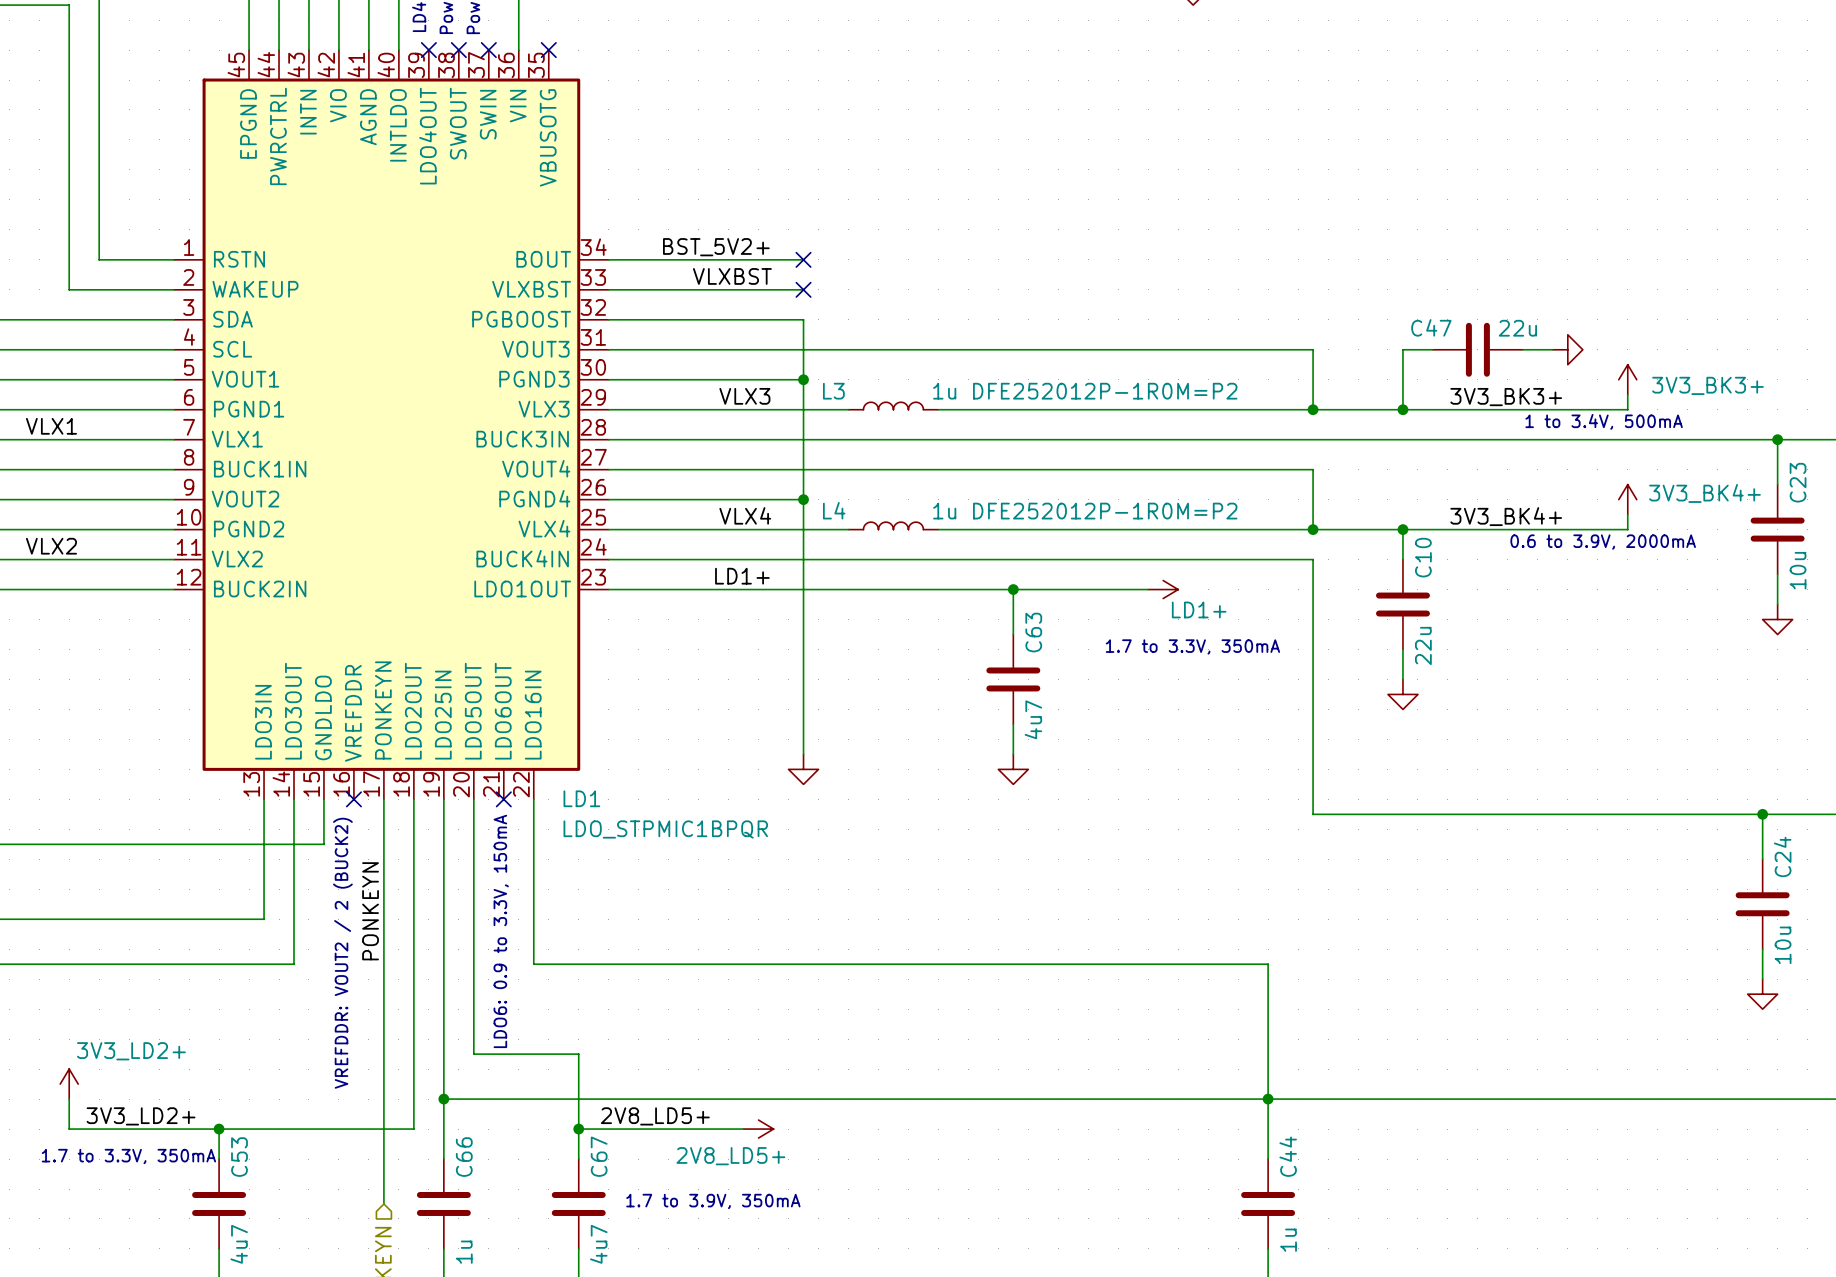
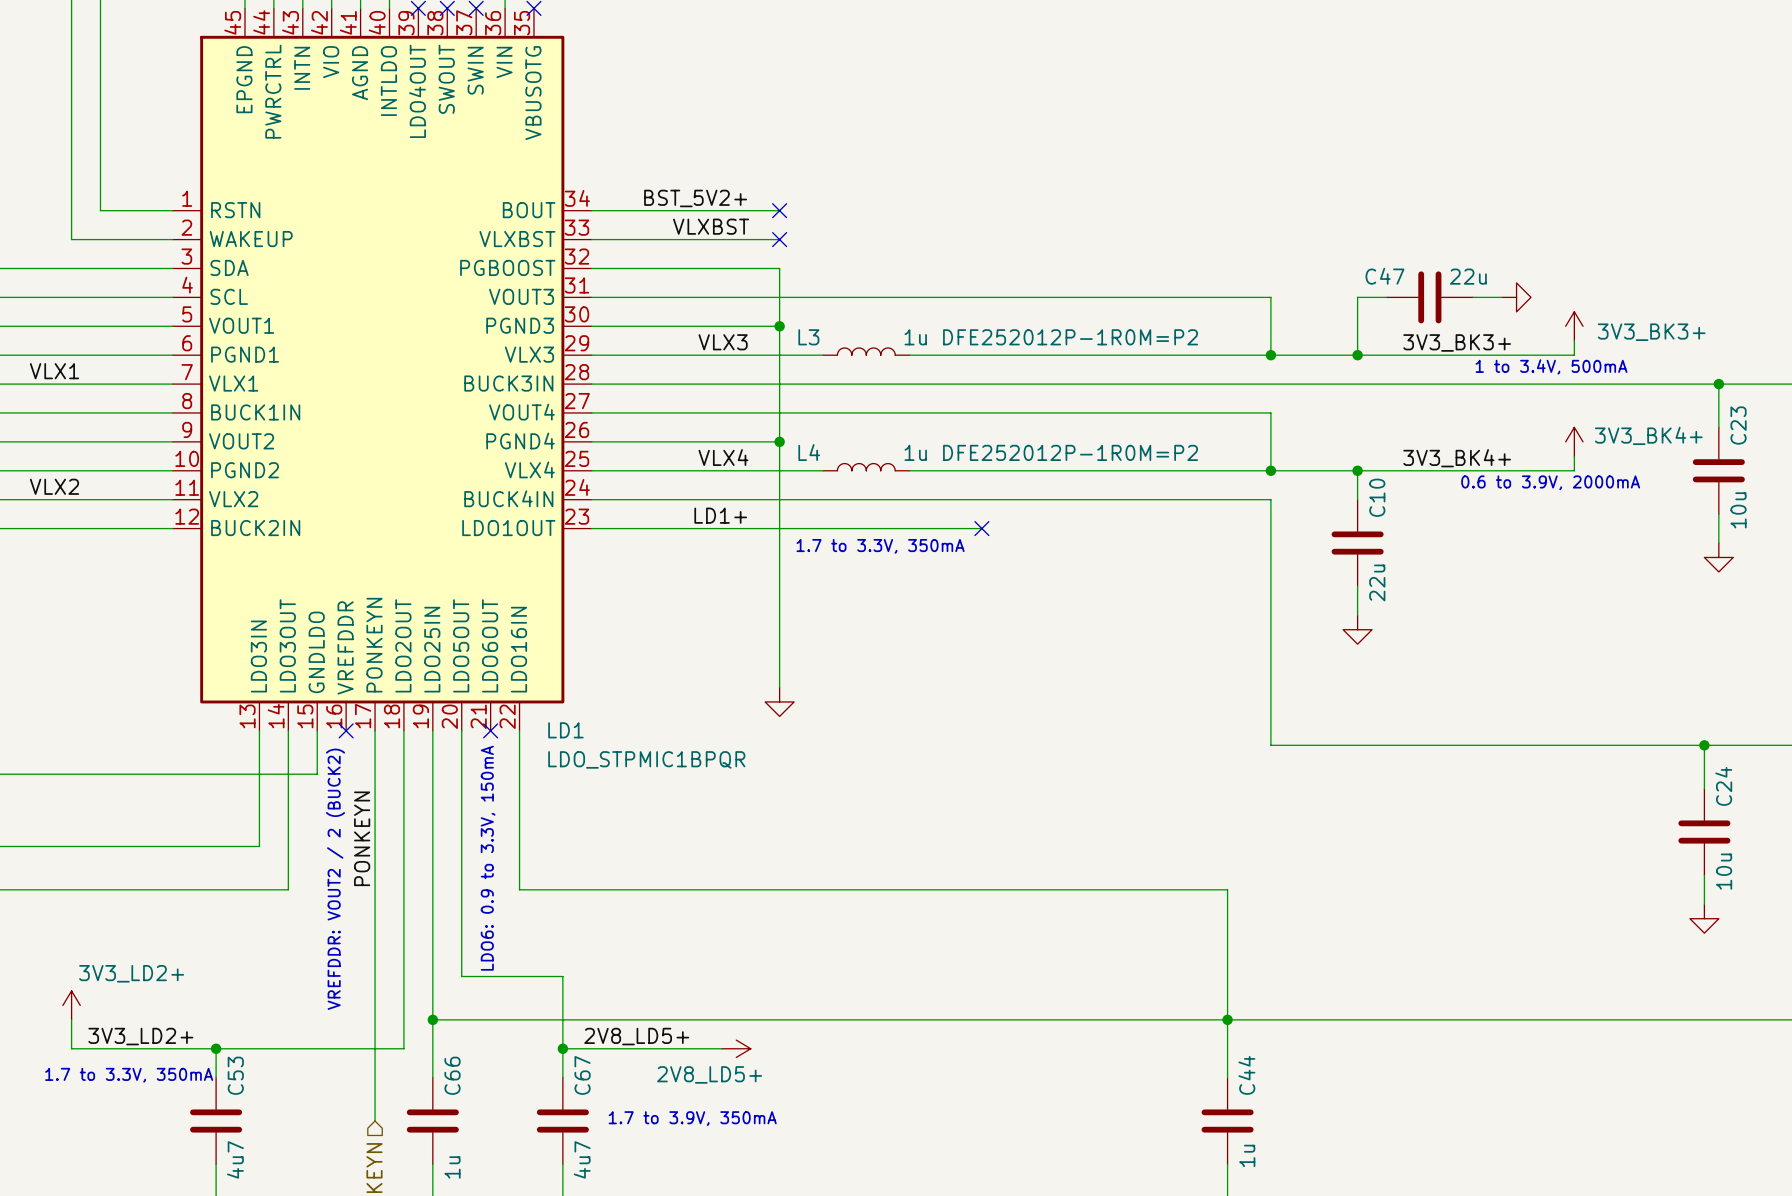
junction: (1013, 589) -> none
no-connect mark: none -> (981, 528)
wire: (1148, 589) (1013, 589) (1013, 634) -> none
power symbol: LD1+ (1163, 589) -> none
text position: 1.7 to 3.3V, 350mA (1192, 646) -> 1.7 to 3.3V, 350mA (880, 546)
C63: 4u7 (1013, 679) -> none
wire: (1013, 724) (1013, 754) -> none
power symbol: (1013, 769) -> none

